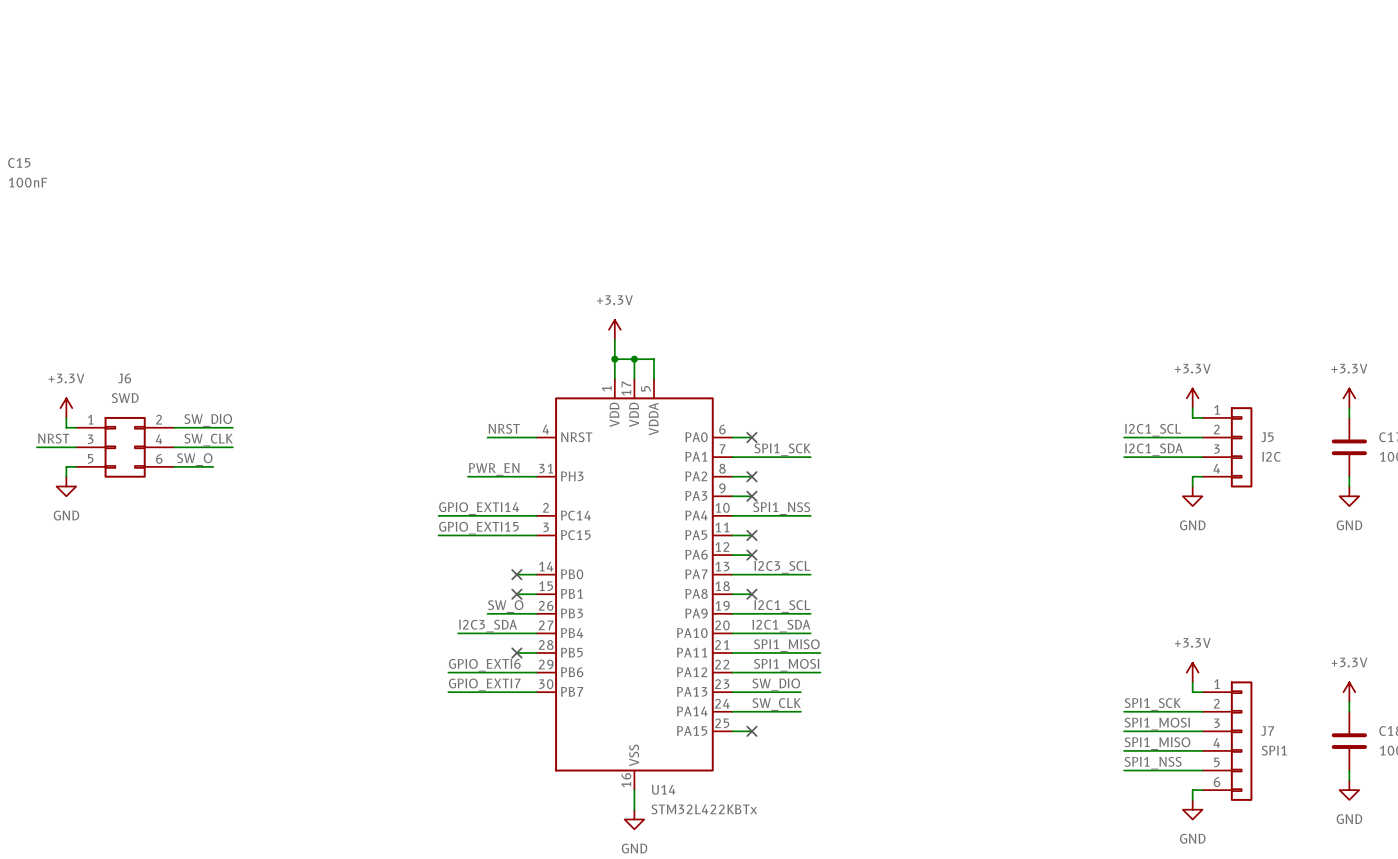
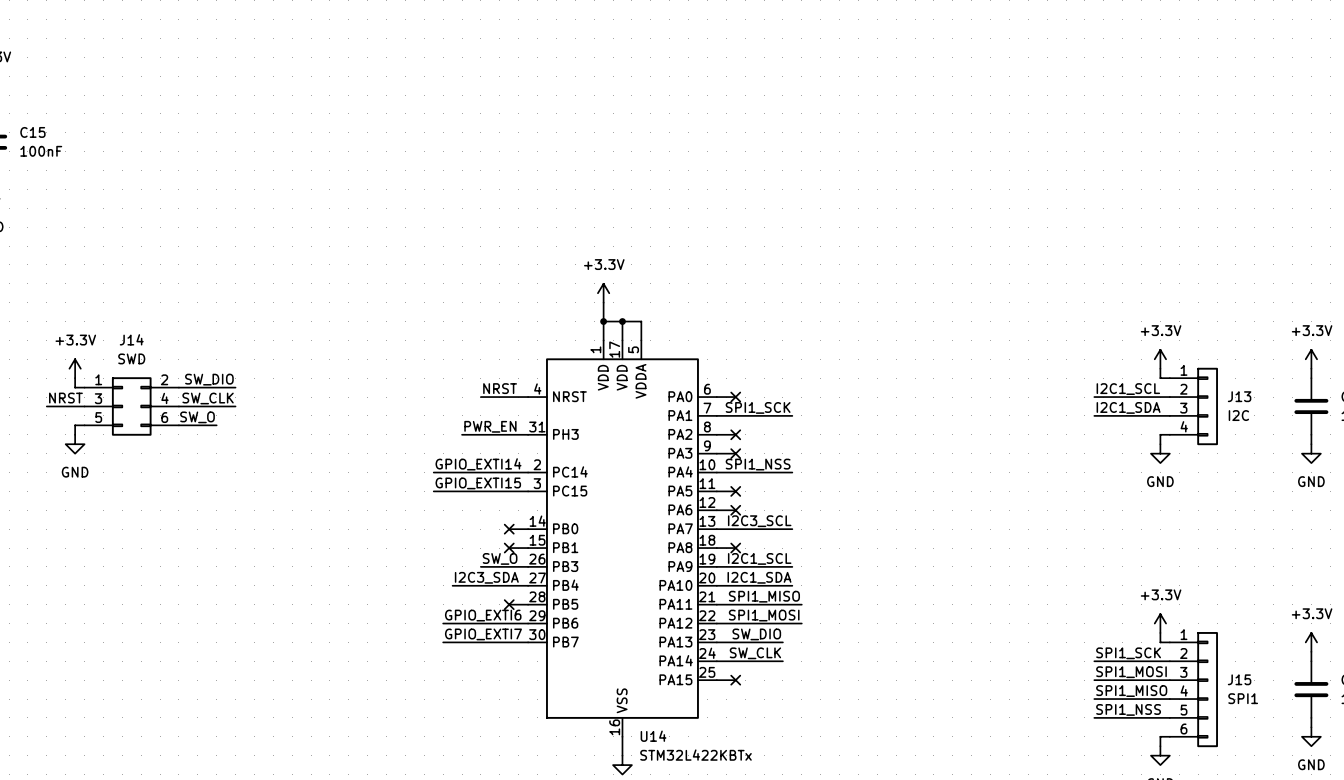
J6 name: J6 (124, 378) -> J14 (131, 339)
J5 name: J5 (1267, 437) -> J13 (1239, 396)
J7 name: J7 (1267, 731) -> J15 (1239, 679)

